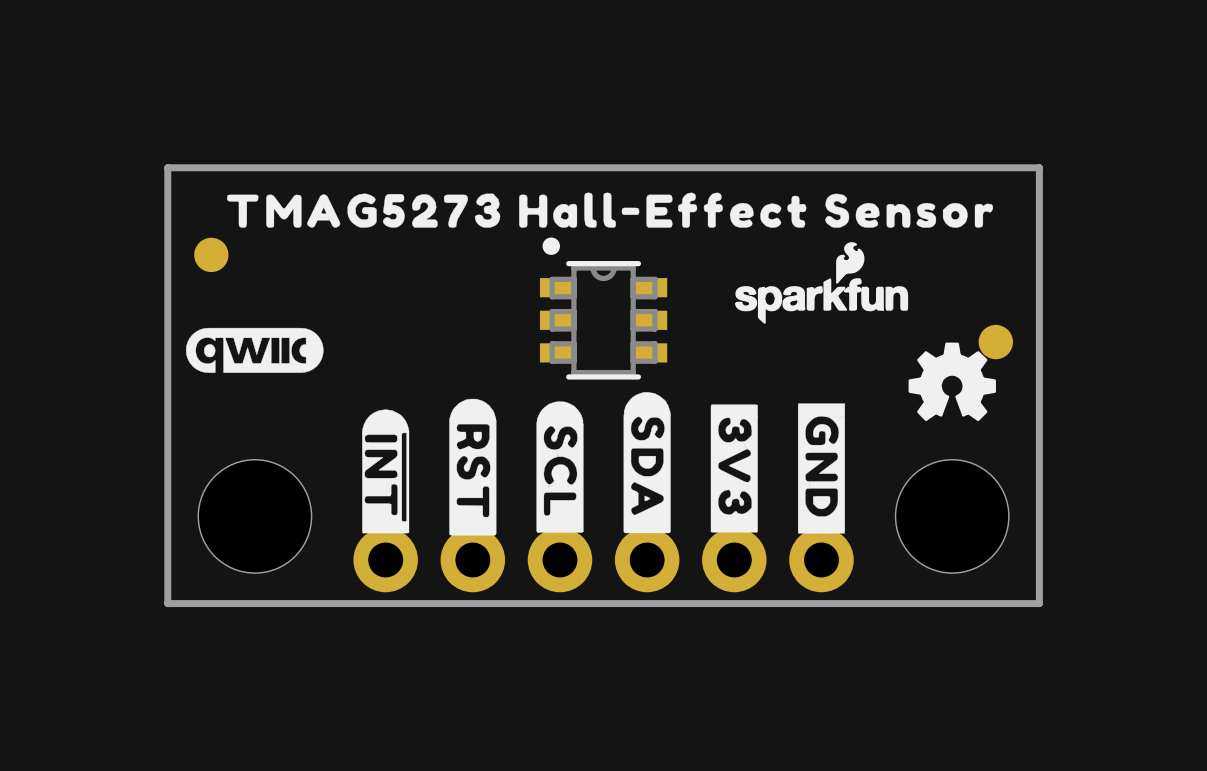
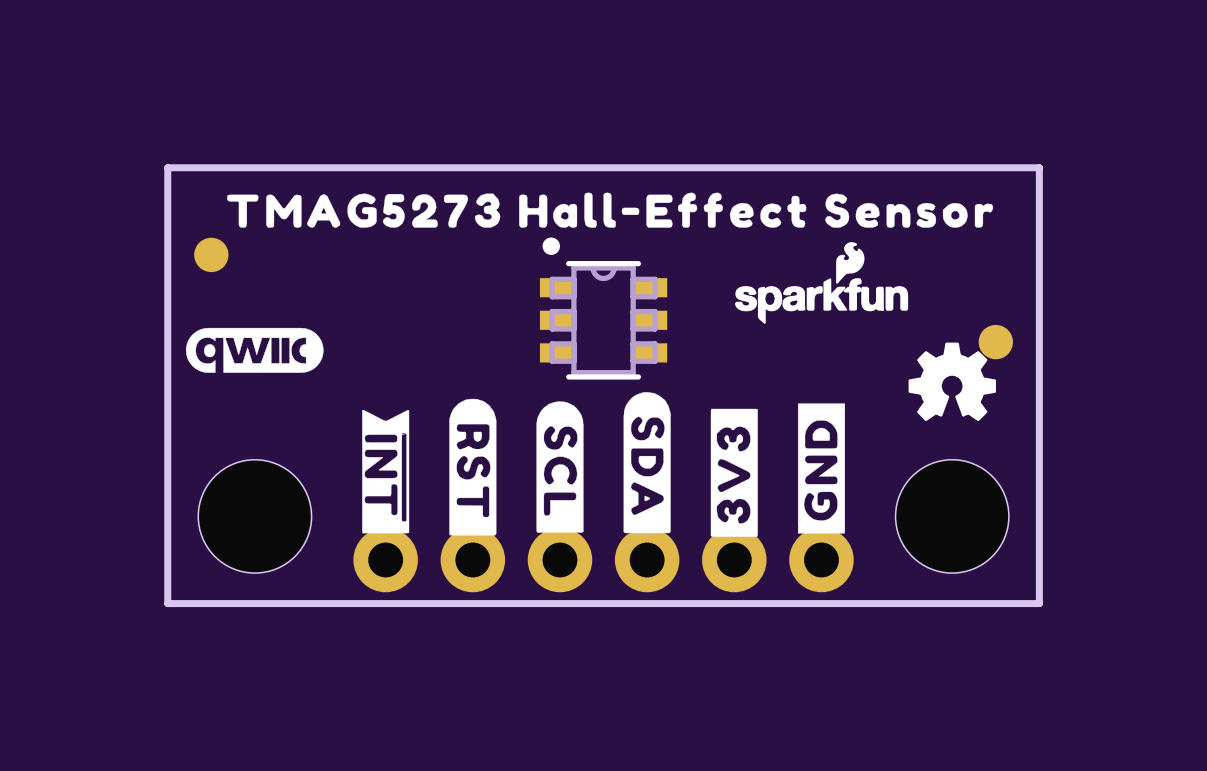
drawing shape: [797, 403, 845, 534] -> [797, 403, 845, 534]
drawing shape: [710, 404, 758, 533] -> [710, 408, 758, 537]
drawing shape: [362, 409, 410, 534] -> [362, 410, 410, 534]

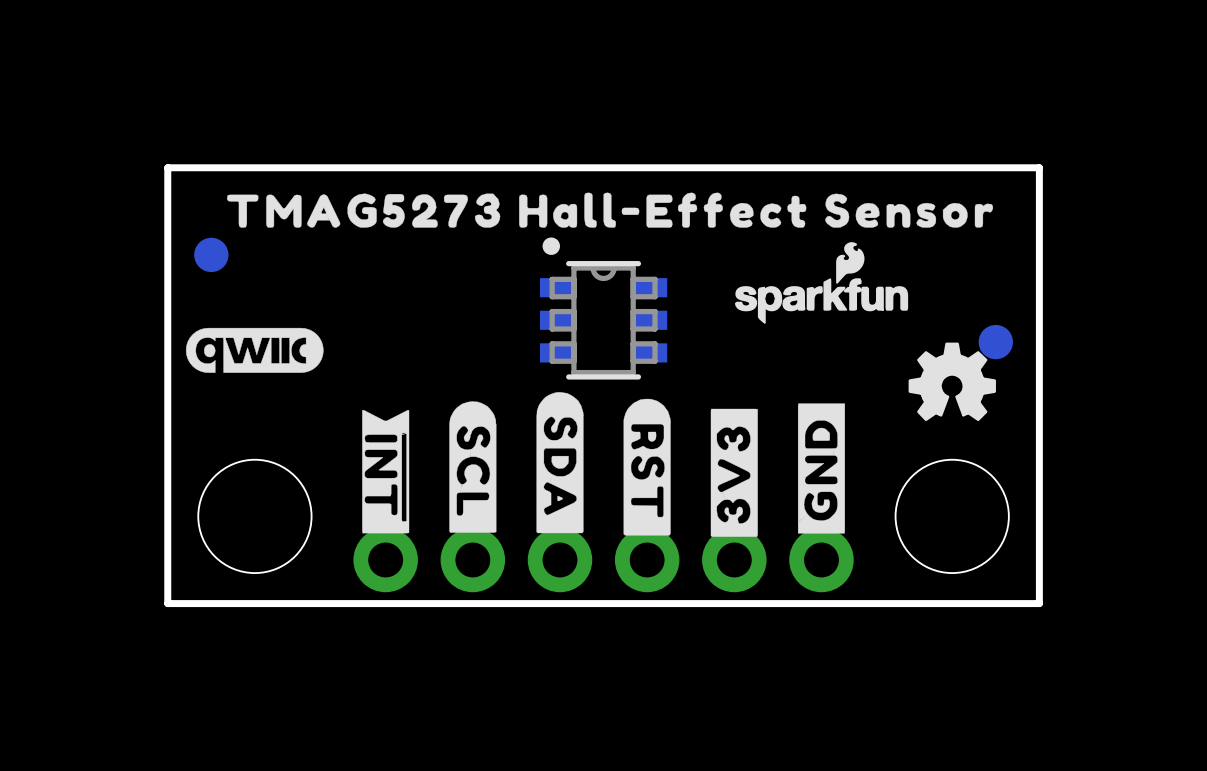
drawing position: (647, 462) -> (559, 462)
drawing position: (472, 467) -> (647, 467)
drawing position: (559, 467) -> (472, 467)

